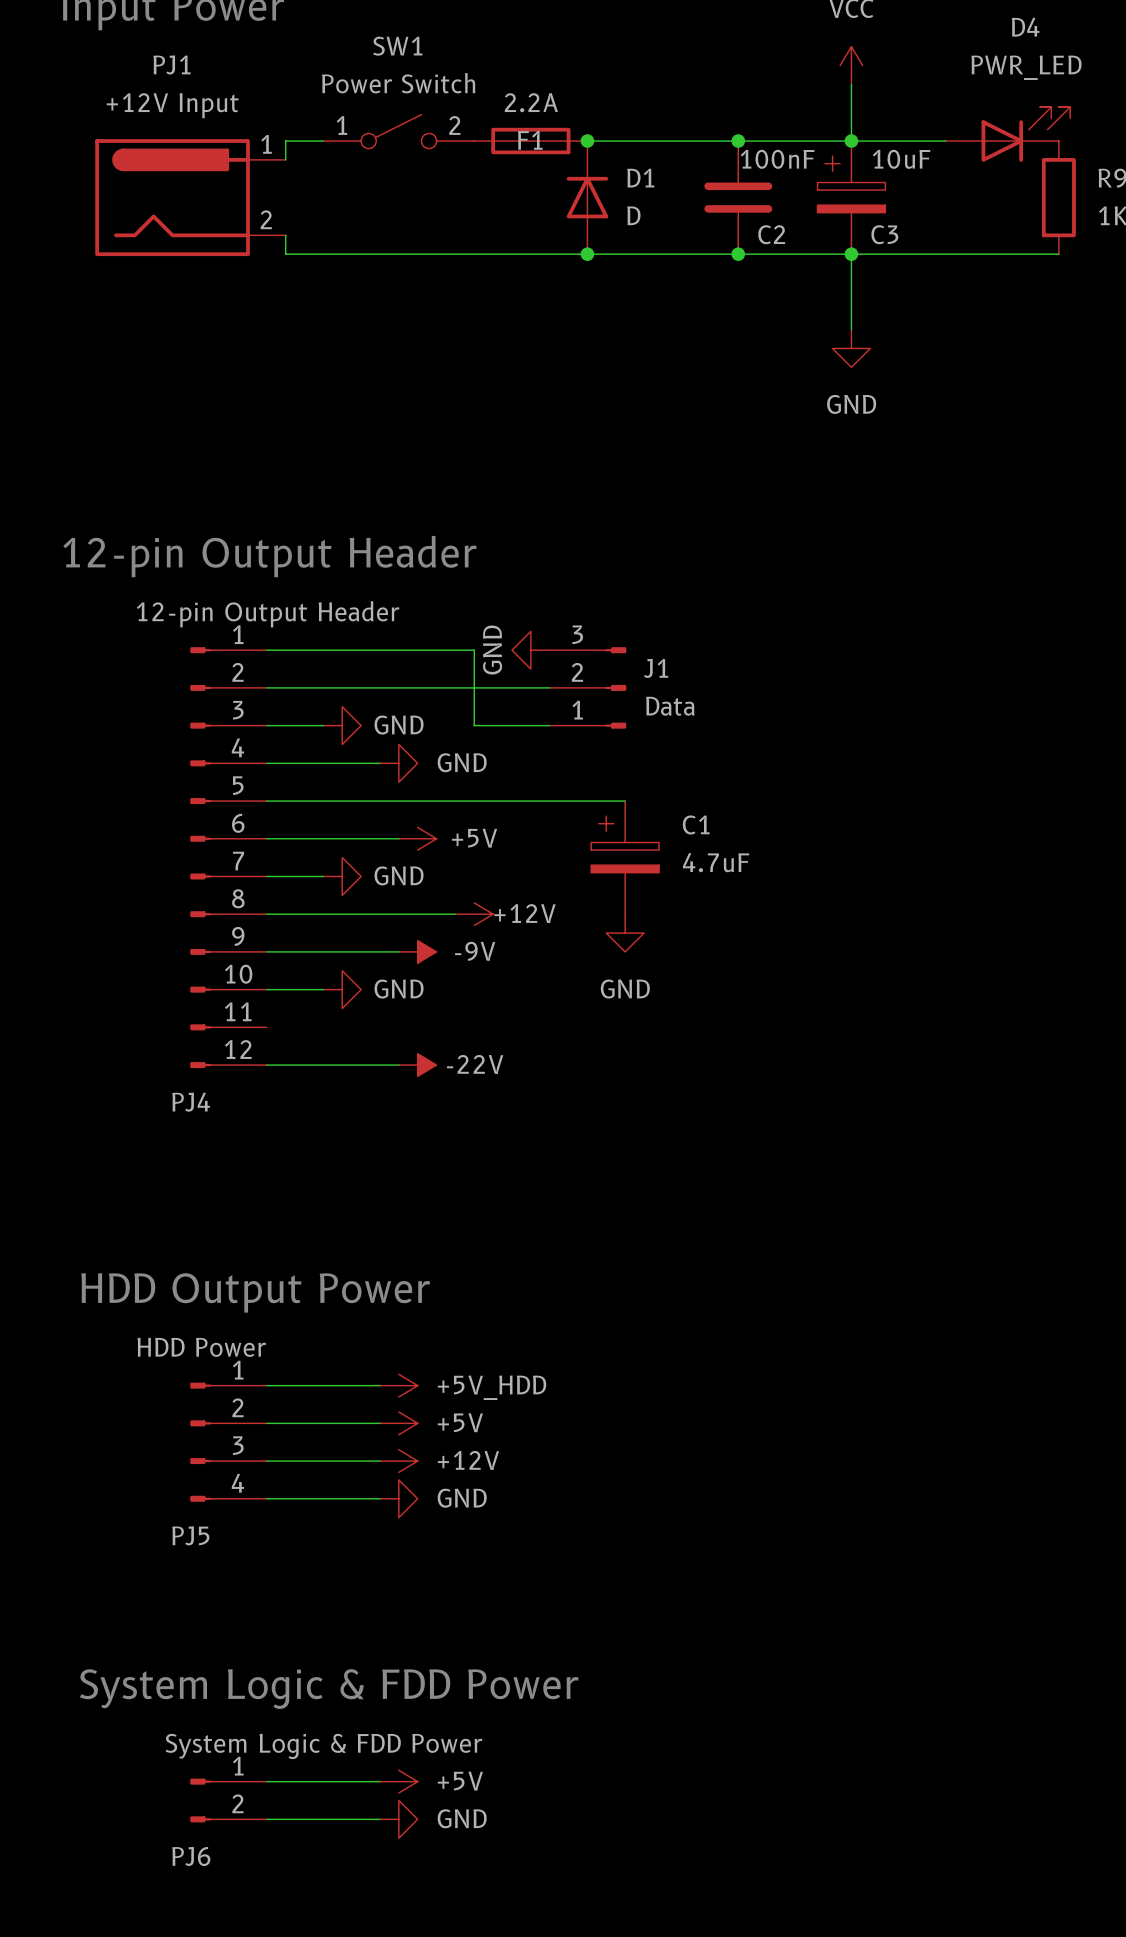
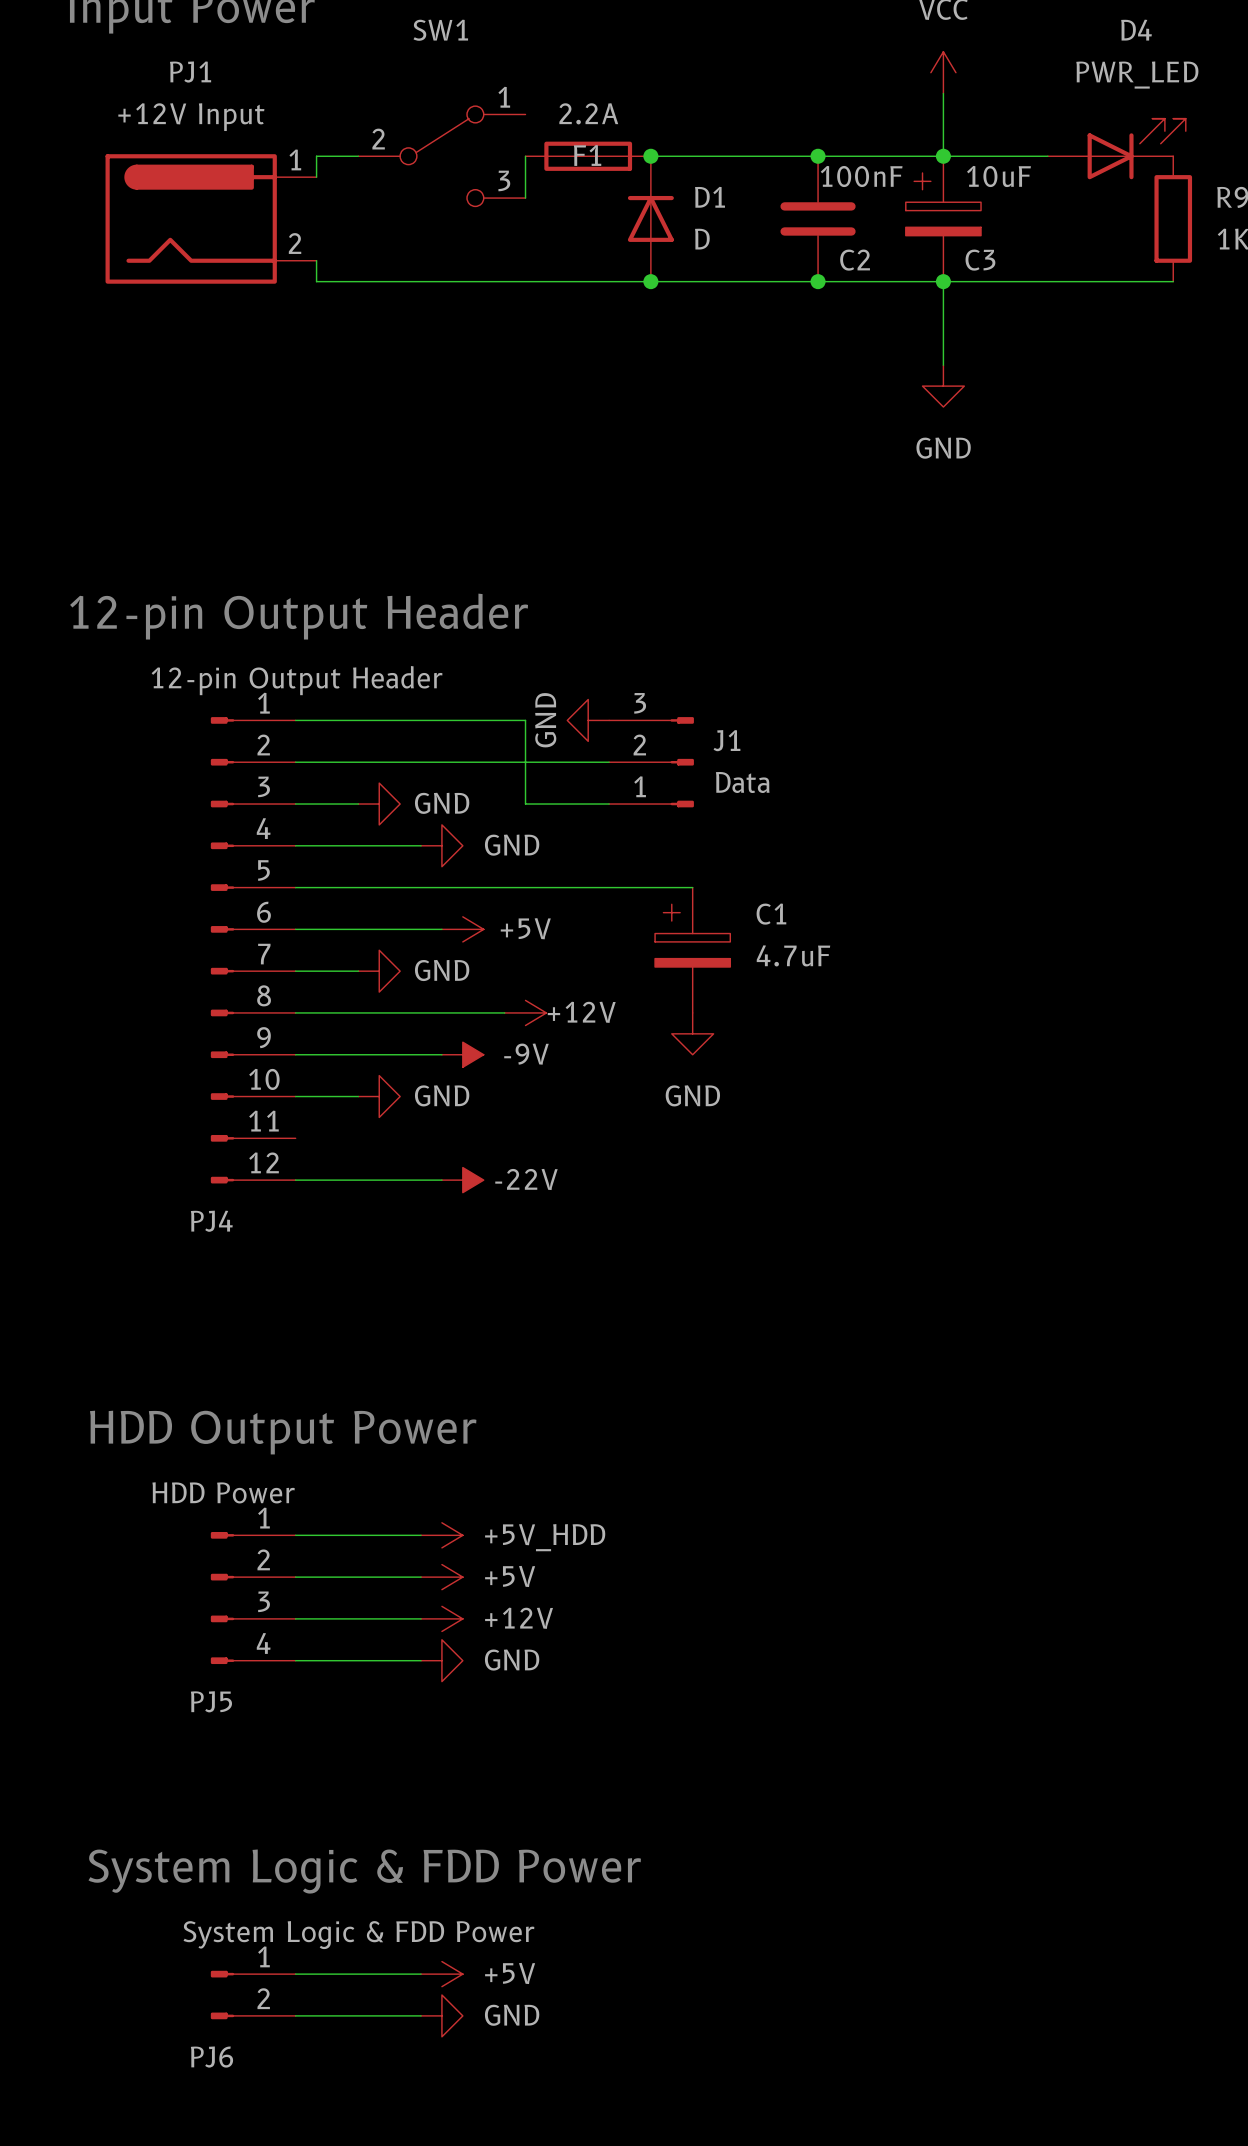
SW1 value: Power Switch (398, 83) -> none
SW1 symbol: [323, 114, 475, 149] -> [358, 106, 526, 207]
wire: none -> (525, 156) (525, 198)

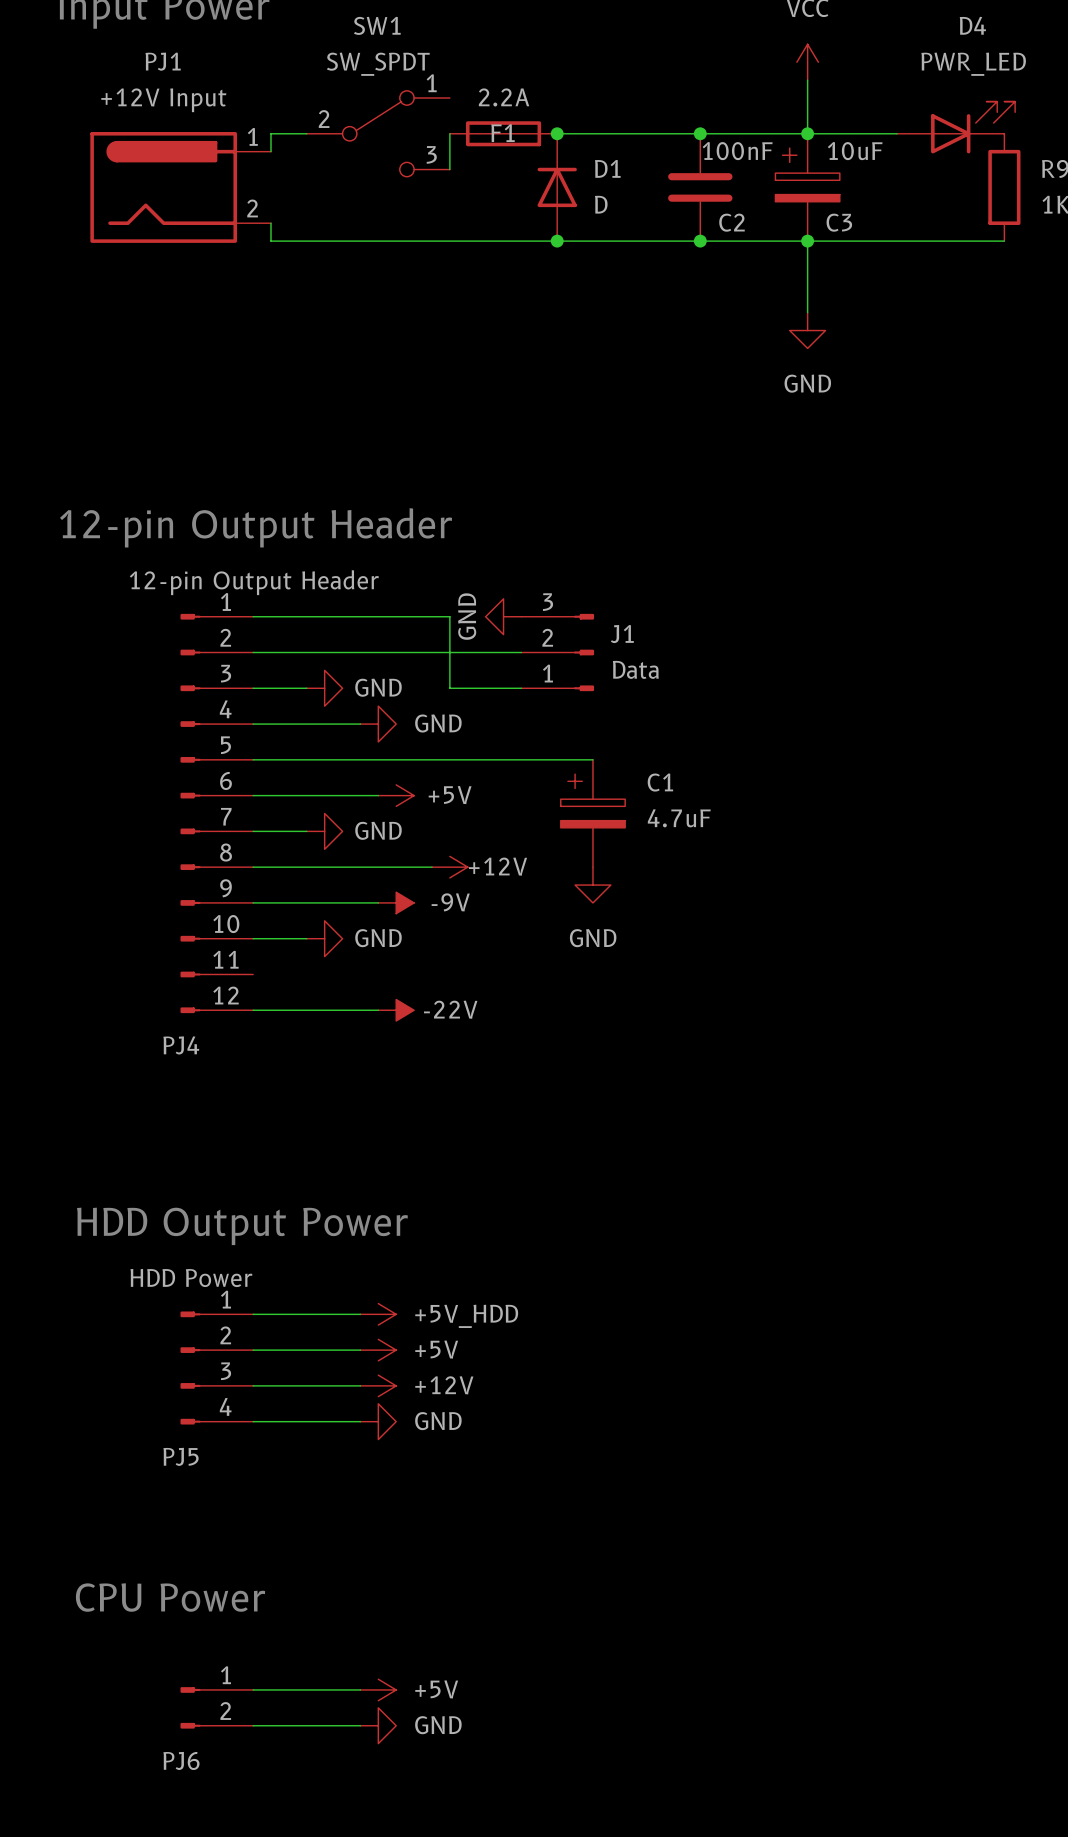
SW1 value: none -> SW_SPDT (378, 64)
text: System Logic & FDD Power (364, 1871) -> CPU Power (170, 1597)
PJ6 value: System Logic & FDD Power (358, 1935) -> none

